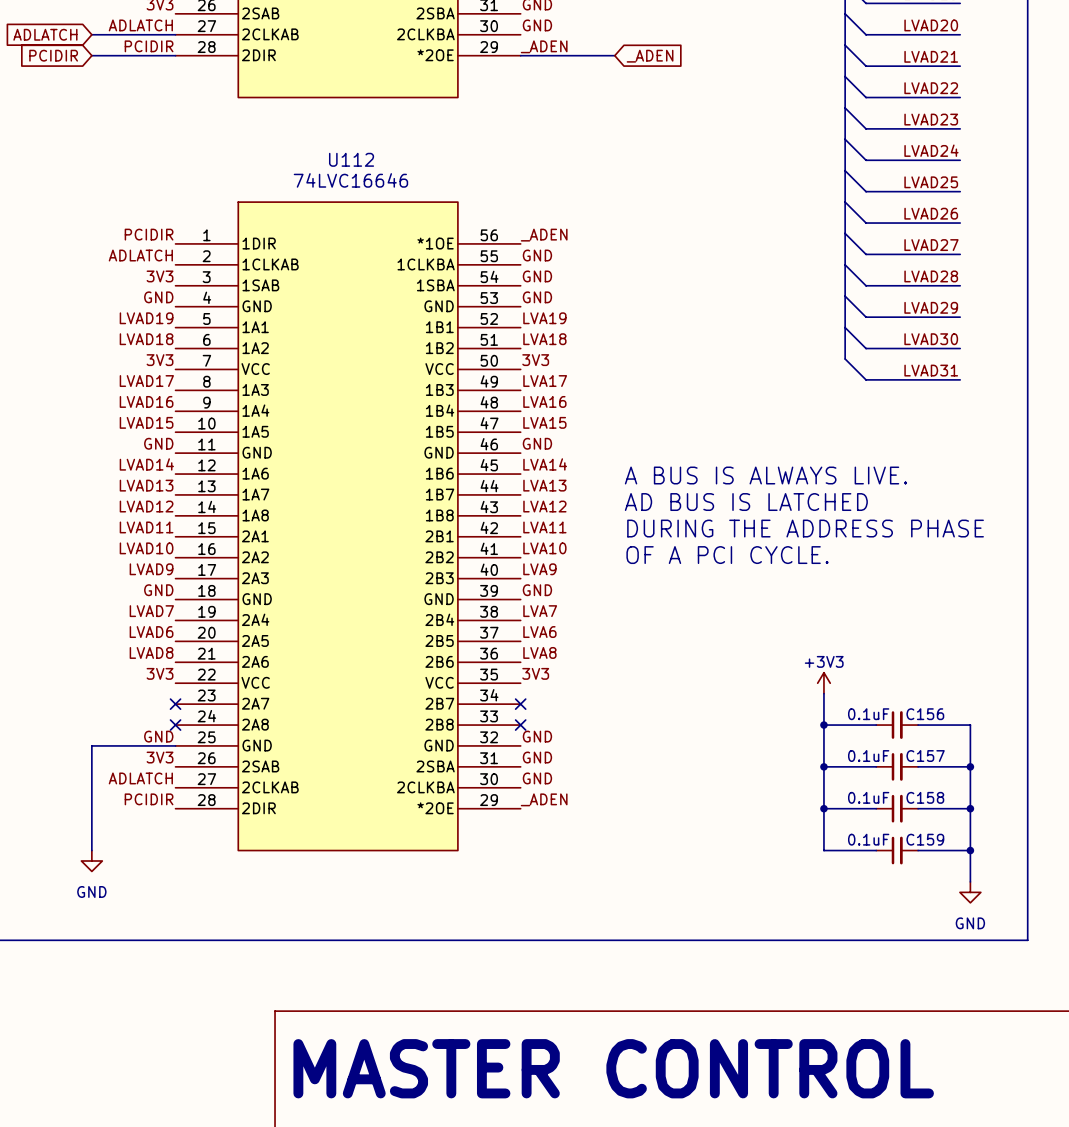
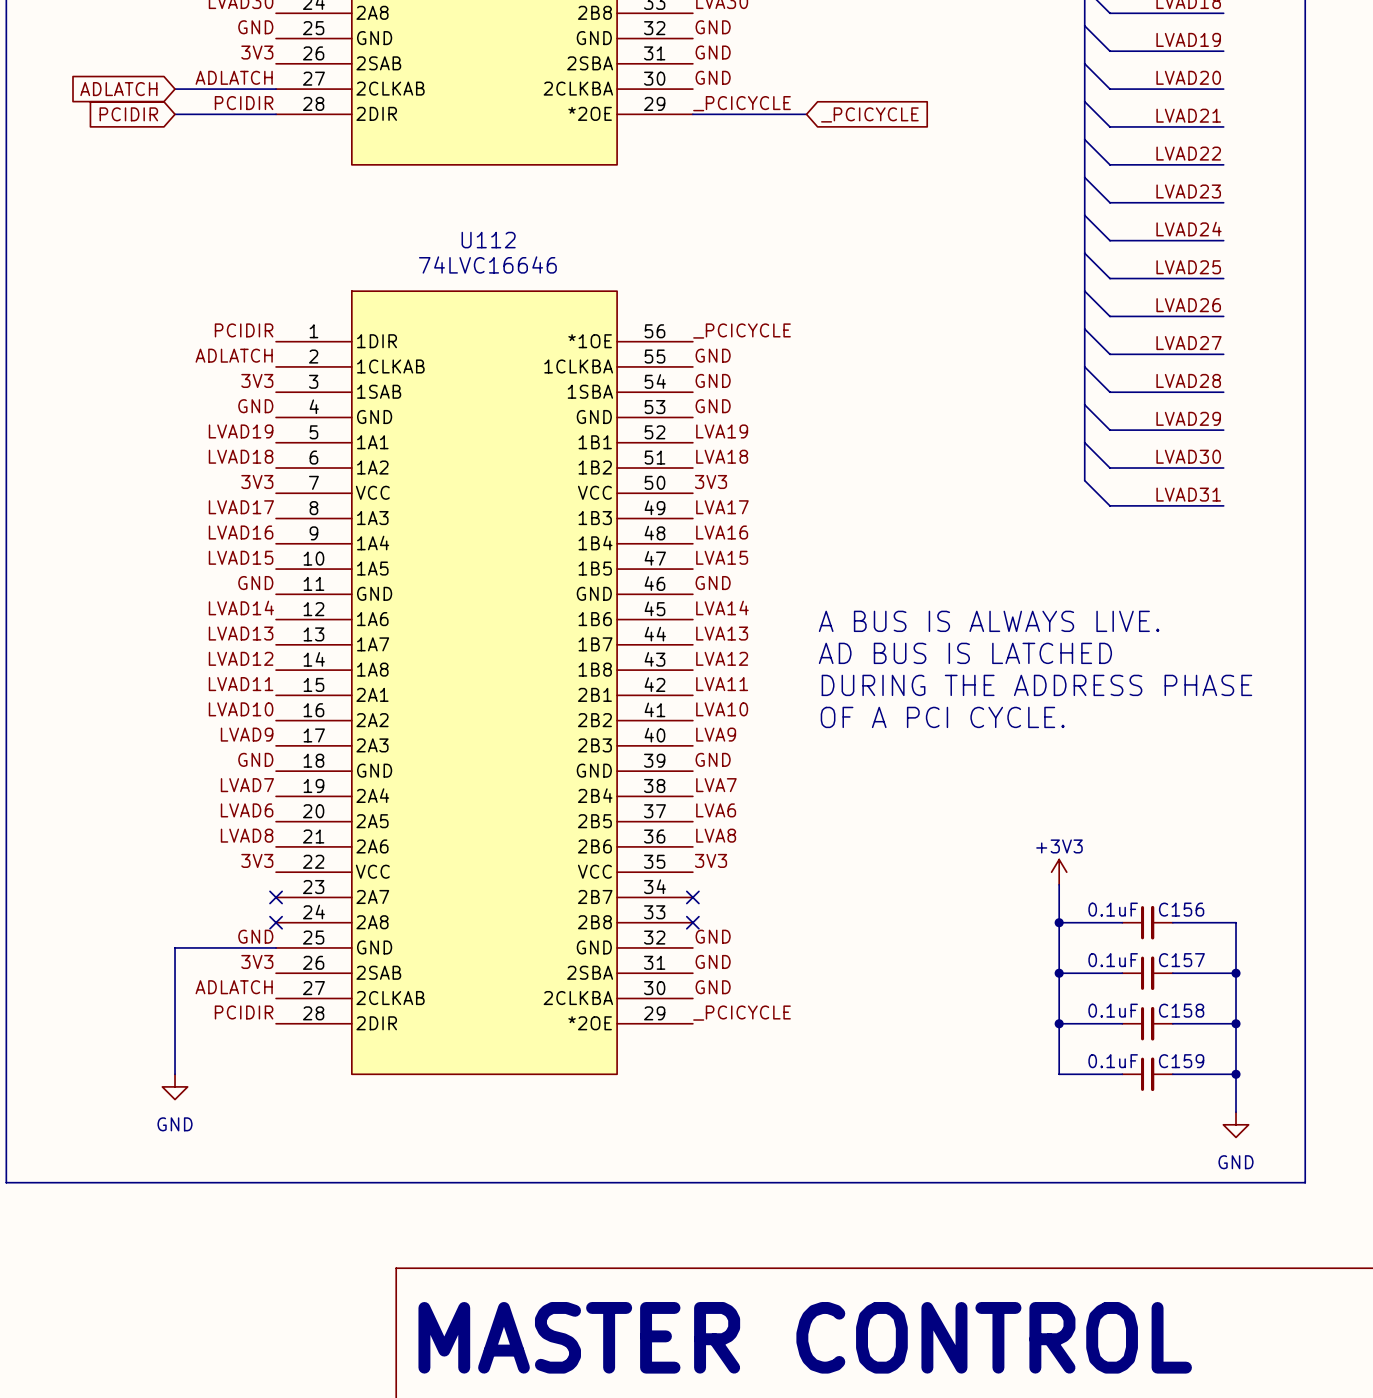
label: _ADEN (544, 46) -> _PCICYCLE (741, 103)
global label: _ADEN (650, 56) -> _PCICYCLE (869, 114)
label: _ADEN (544, 235) -> _PCICYCLE (741, 331)
label: _ADEN (544, 799) -> _PCICYCLE (741, 1013)

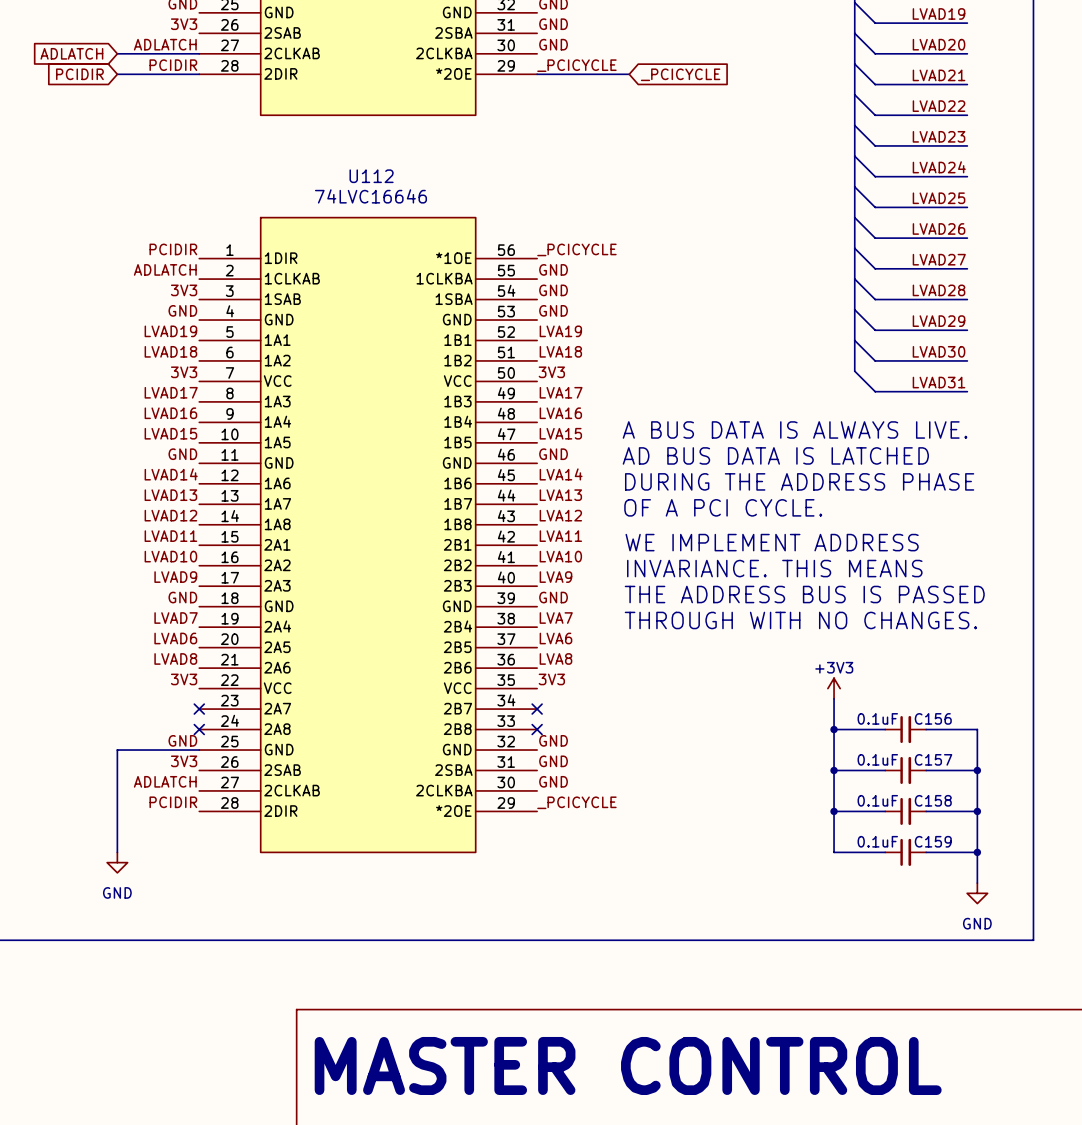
text: none -> A BUS DATA IS ALWAYS LIVE. (795, 429)
text: none -> AD BUS DATA IS LATCHED (775, 455)
text: A BUS IS ALWAYS LIVE. (989, 621) -> none
text: AD BUS IS LATCHED (965, 653) -> none
text position: DURING THE ADDRESS PHASE (1036, 685) -> DURING THE ADDRESS PHASE (799, 481)
text: none -> WE IMPLEMENT ADDRESS (772, 542)
text position: OF A PCI CYCLE. (942, 717) -> OF A PCI CYCLE. (723, 507)
text: none -> INVARIANCE. THIS MEANS (774, 568)
text: none -> THE ADDRESS BUS IS PASSED (804, 594)
text: none -> THROUGH WITH NO CHANGES. (800, 620)

